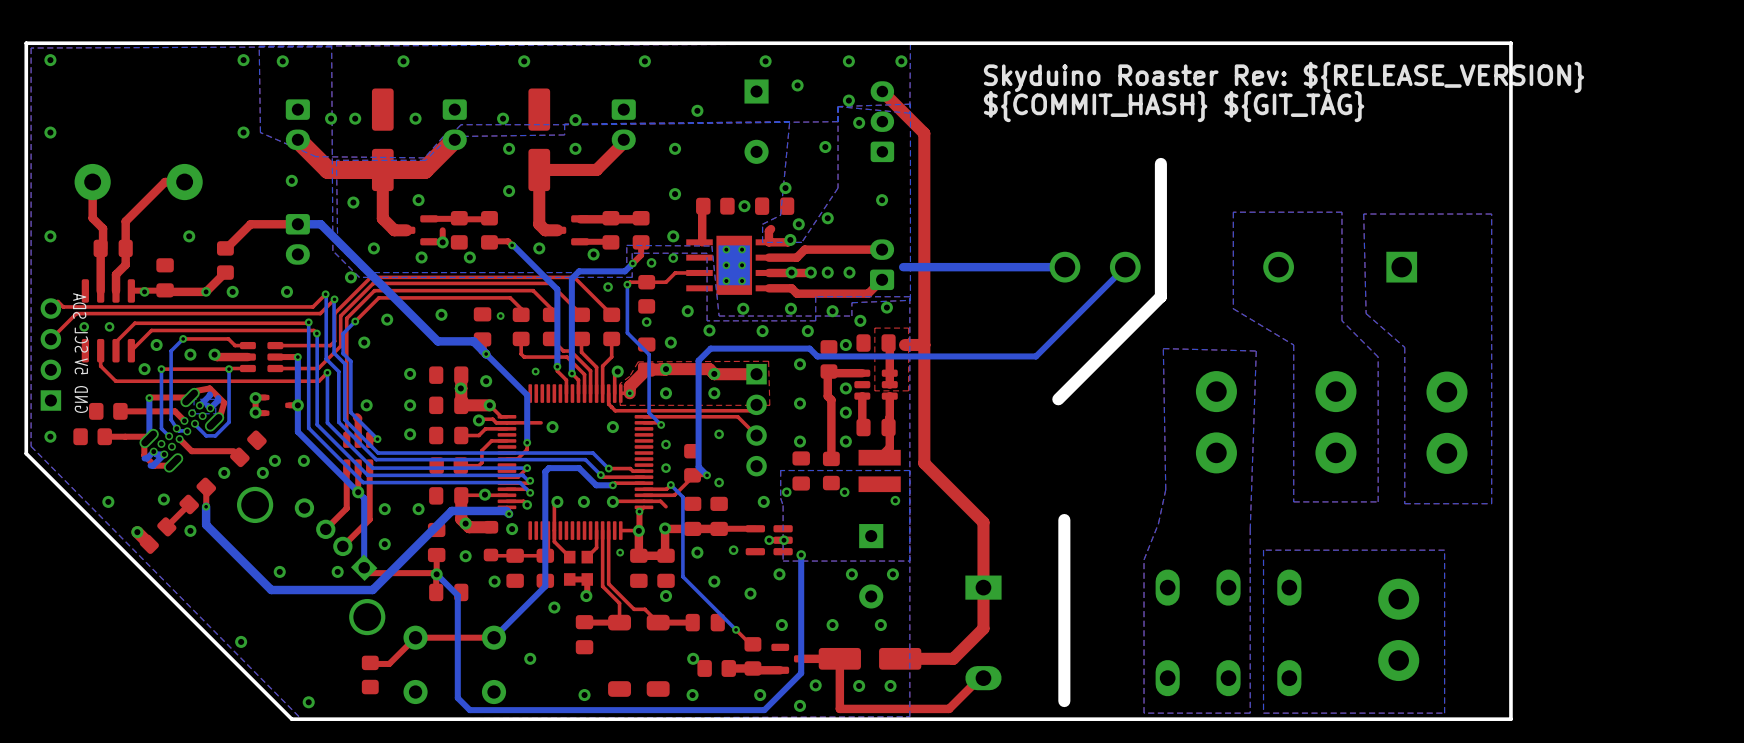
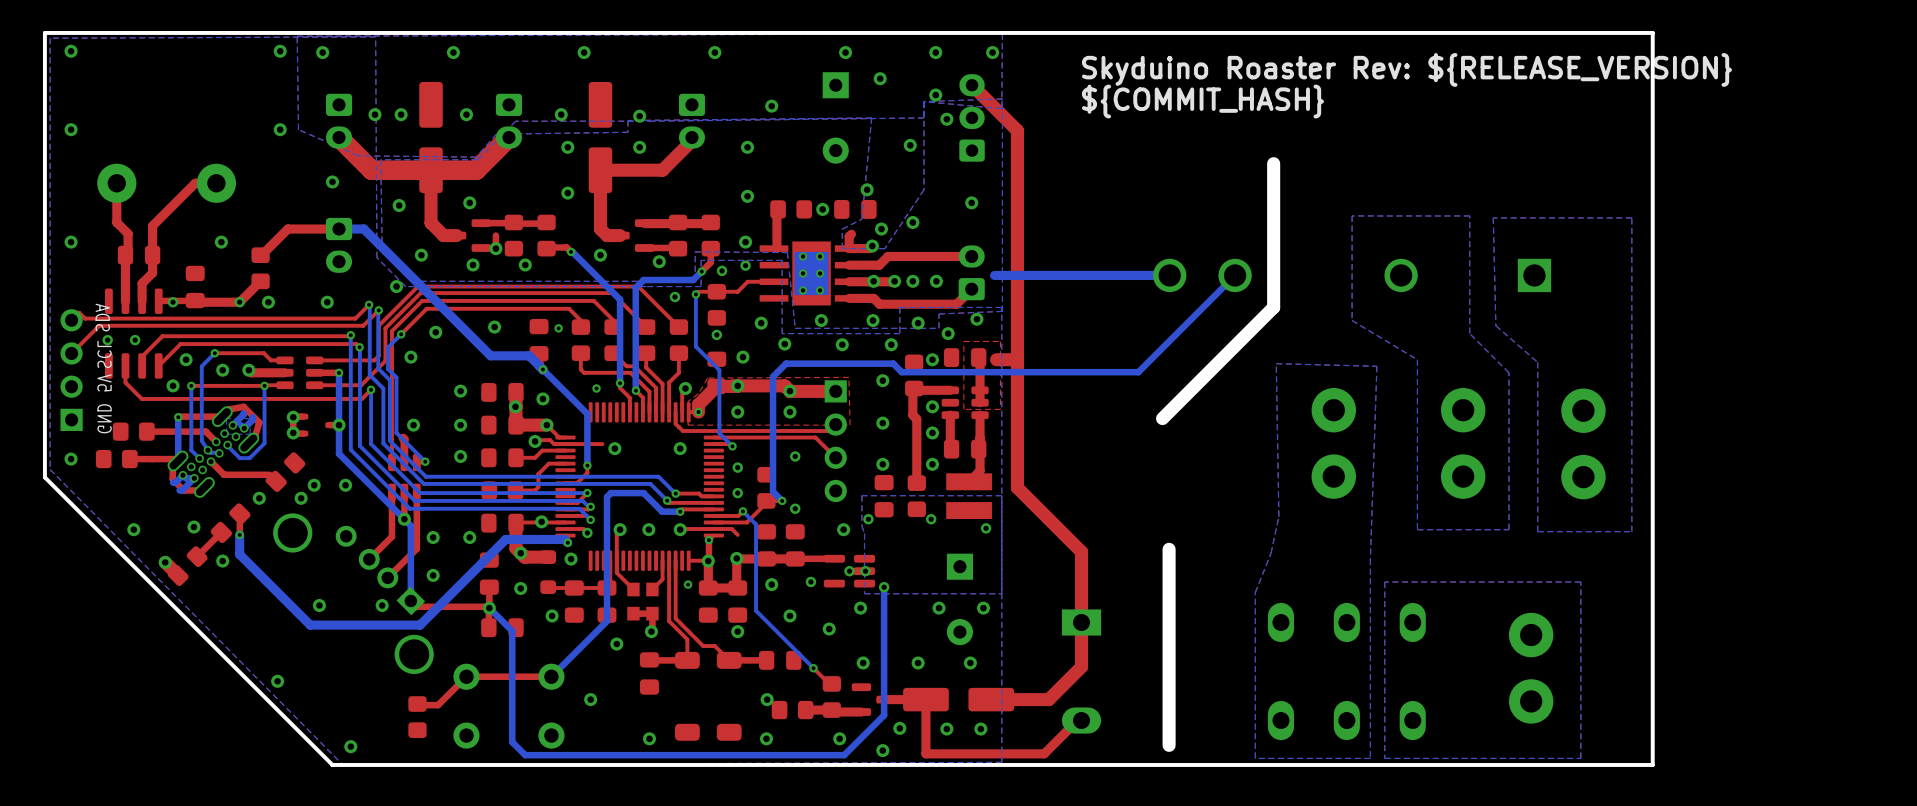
text: ${COMMIT_HASH} ${GIT_TAG} (1174, 106) -> ${COMMIT_HASH} (1202, 101)

